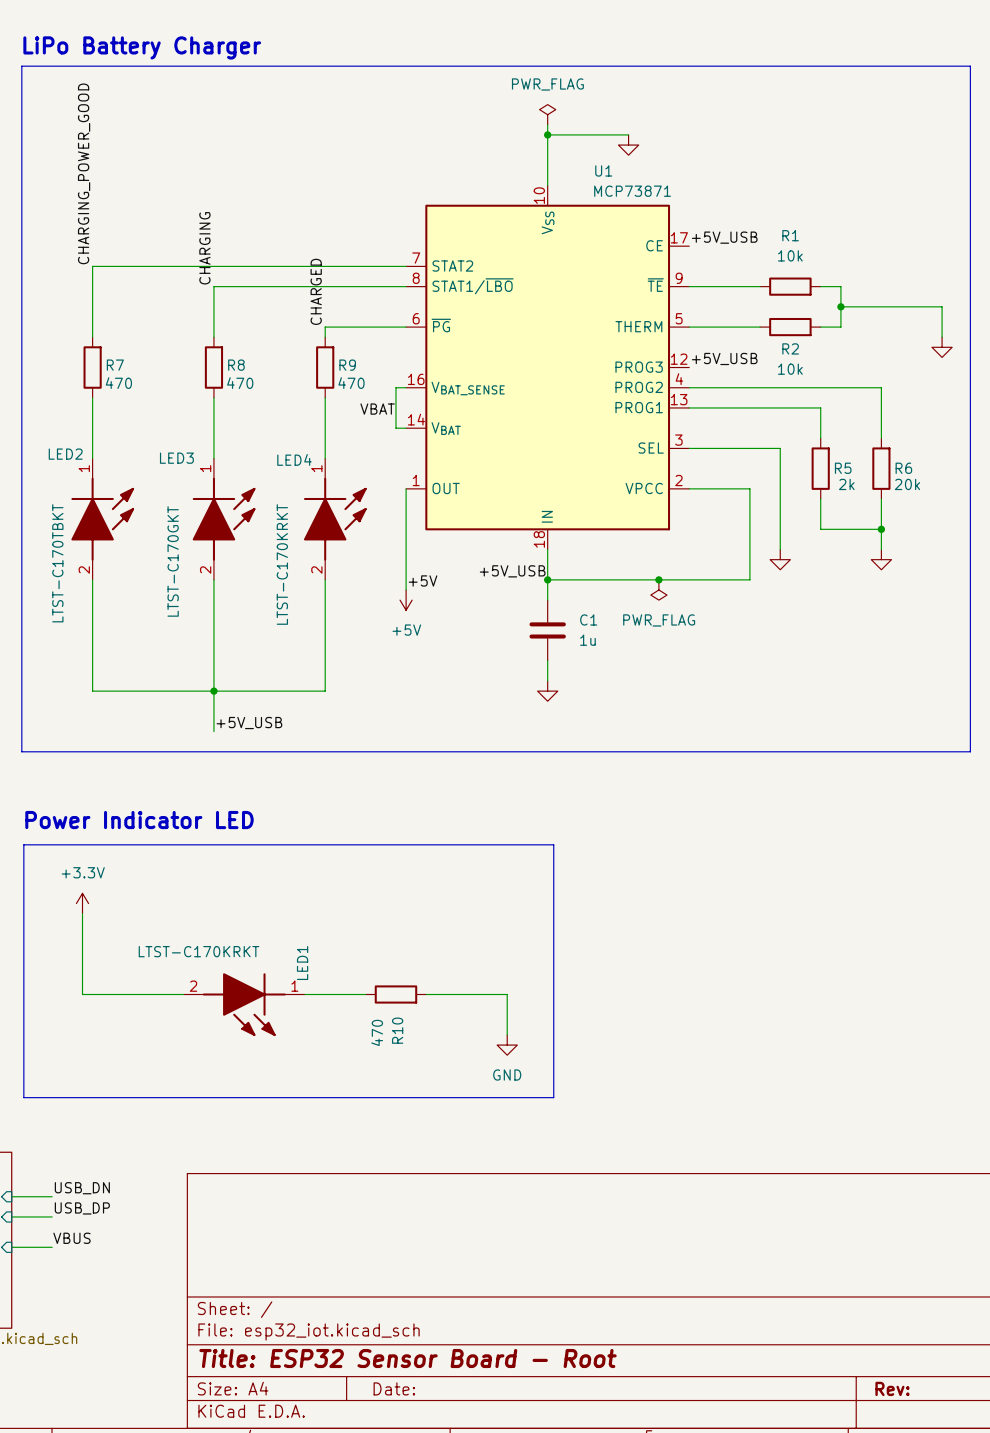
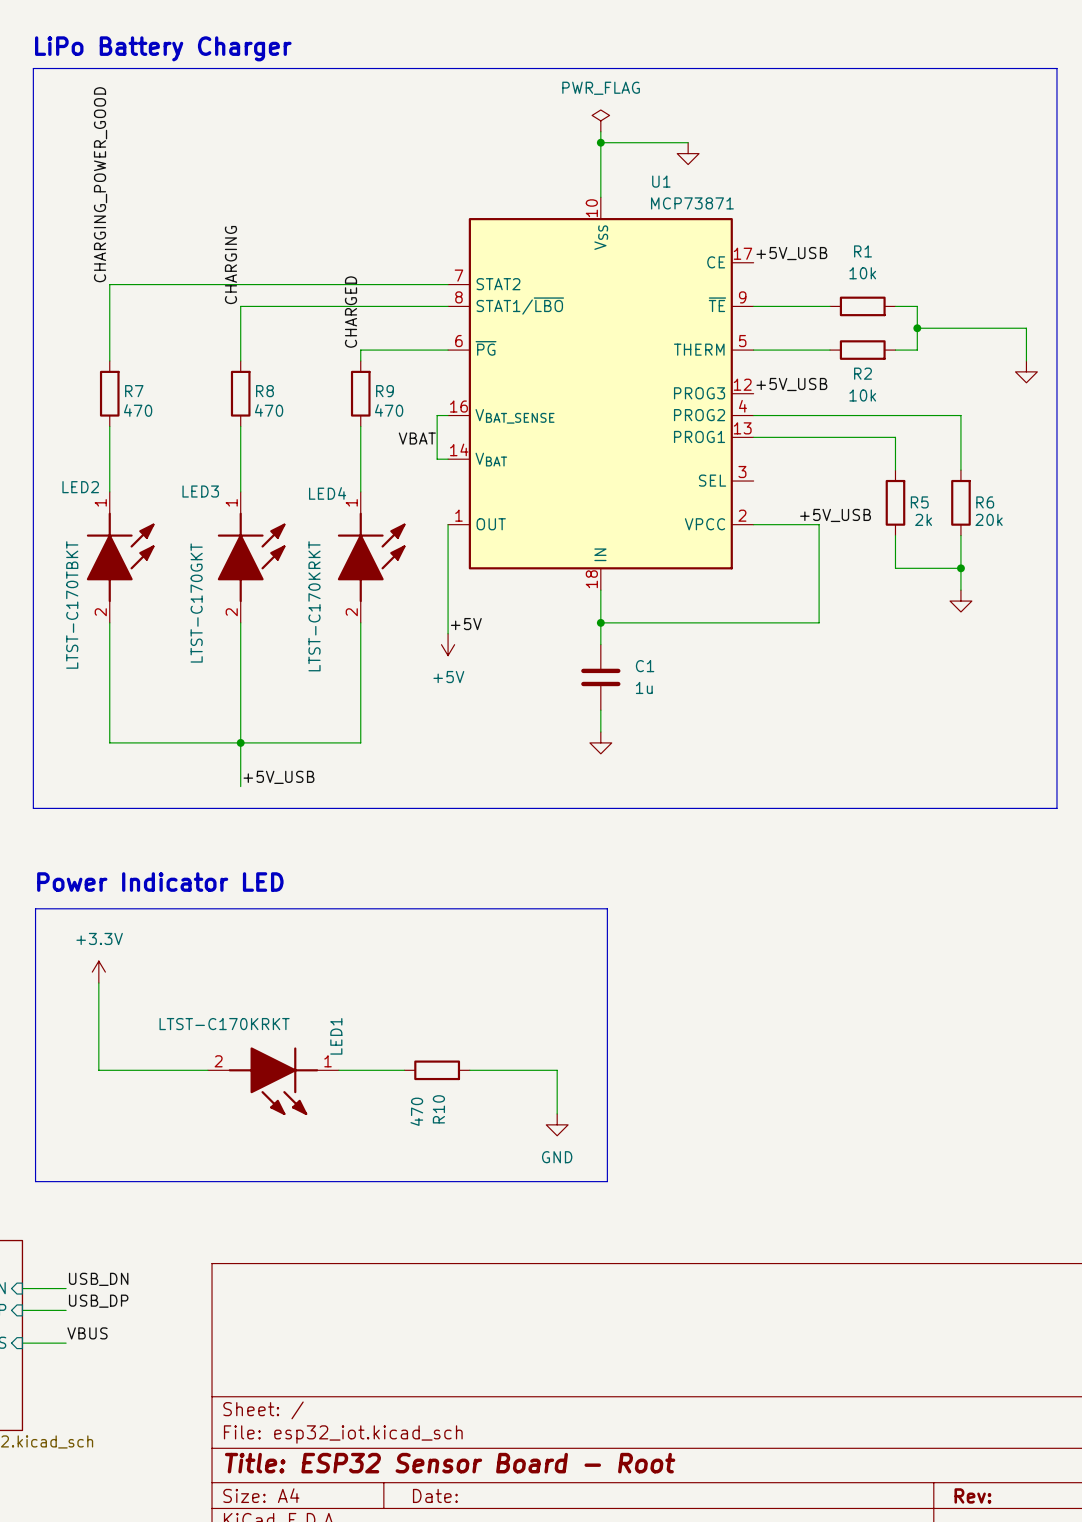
wire: (689, 448) (780, 448) (780, 549) -> none
label: none -> +5V_USB (835, 515)
power symbol: (780, 559) -> none
label: +5V_USB (512, 571) -> none
junction: (658, 579) -> none
power symbol: PWR_FLAG (658, 590) -> none

